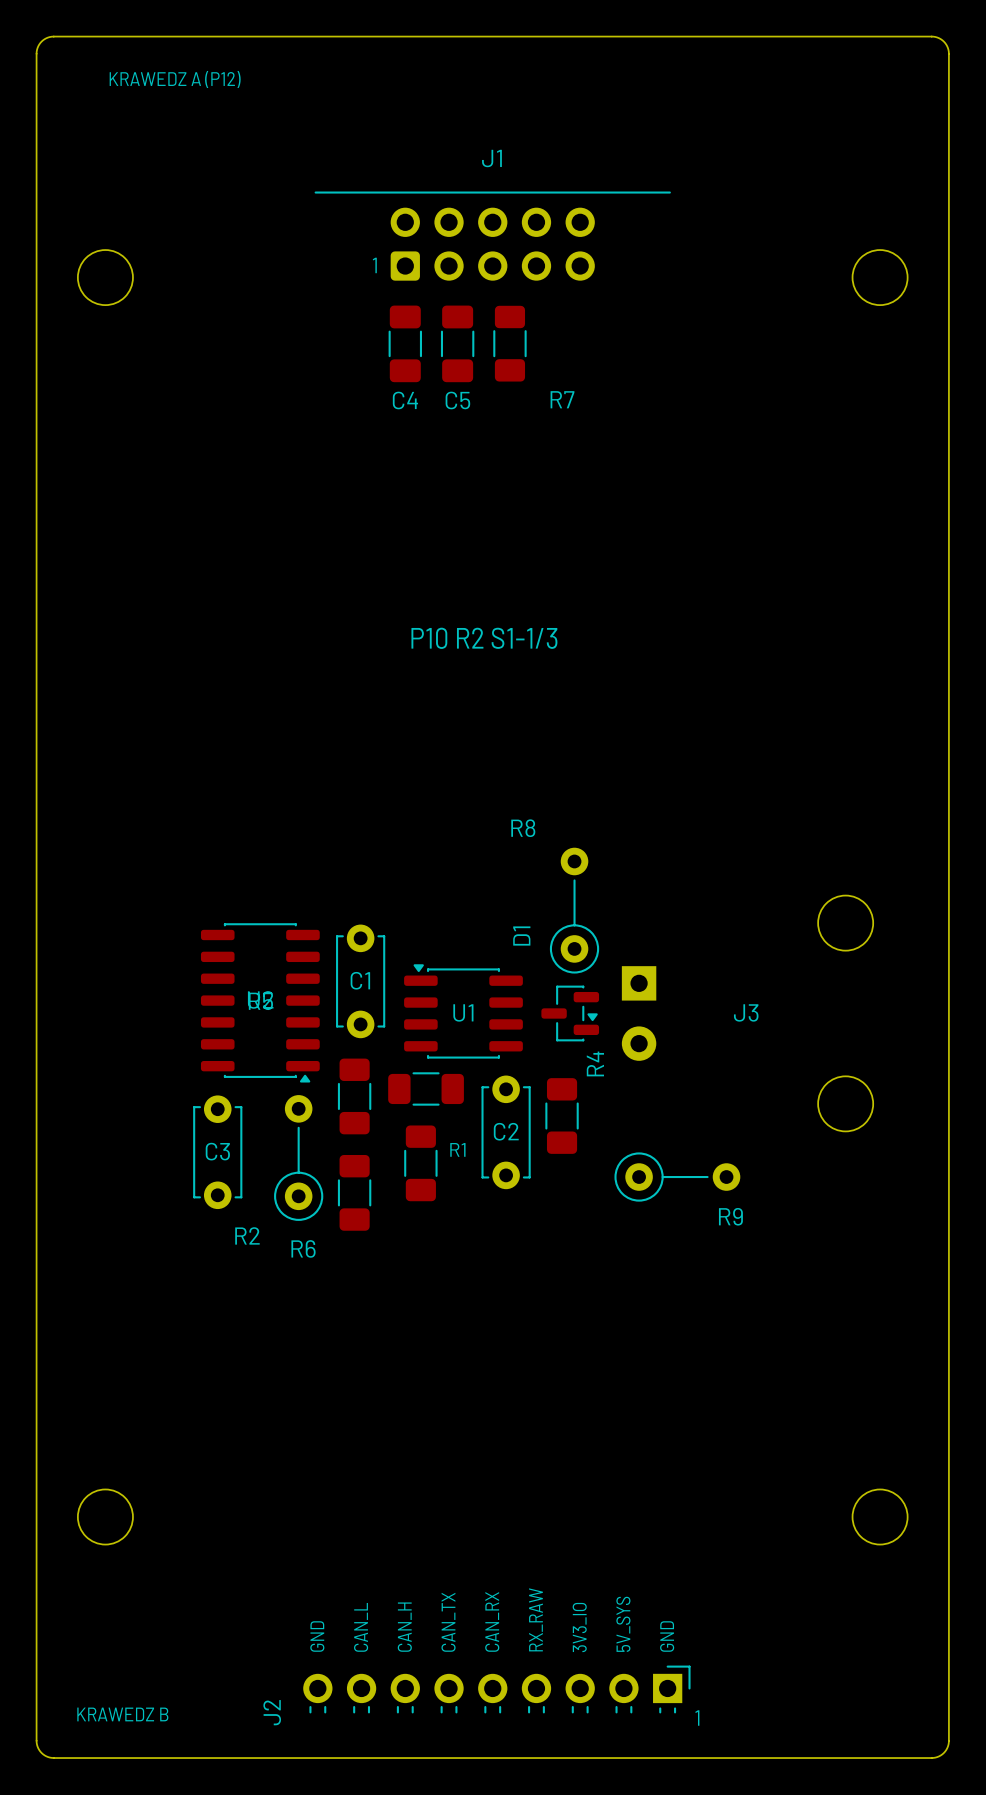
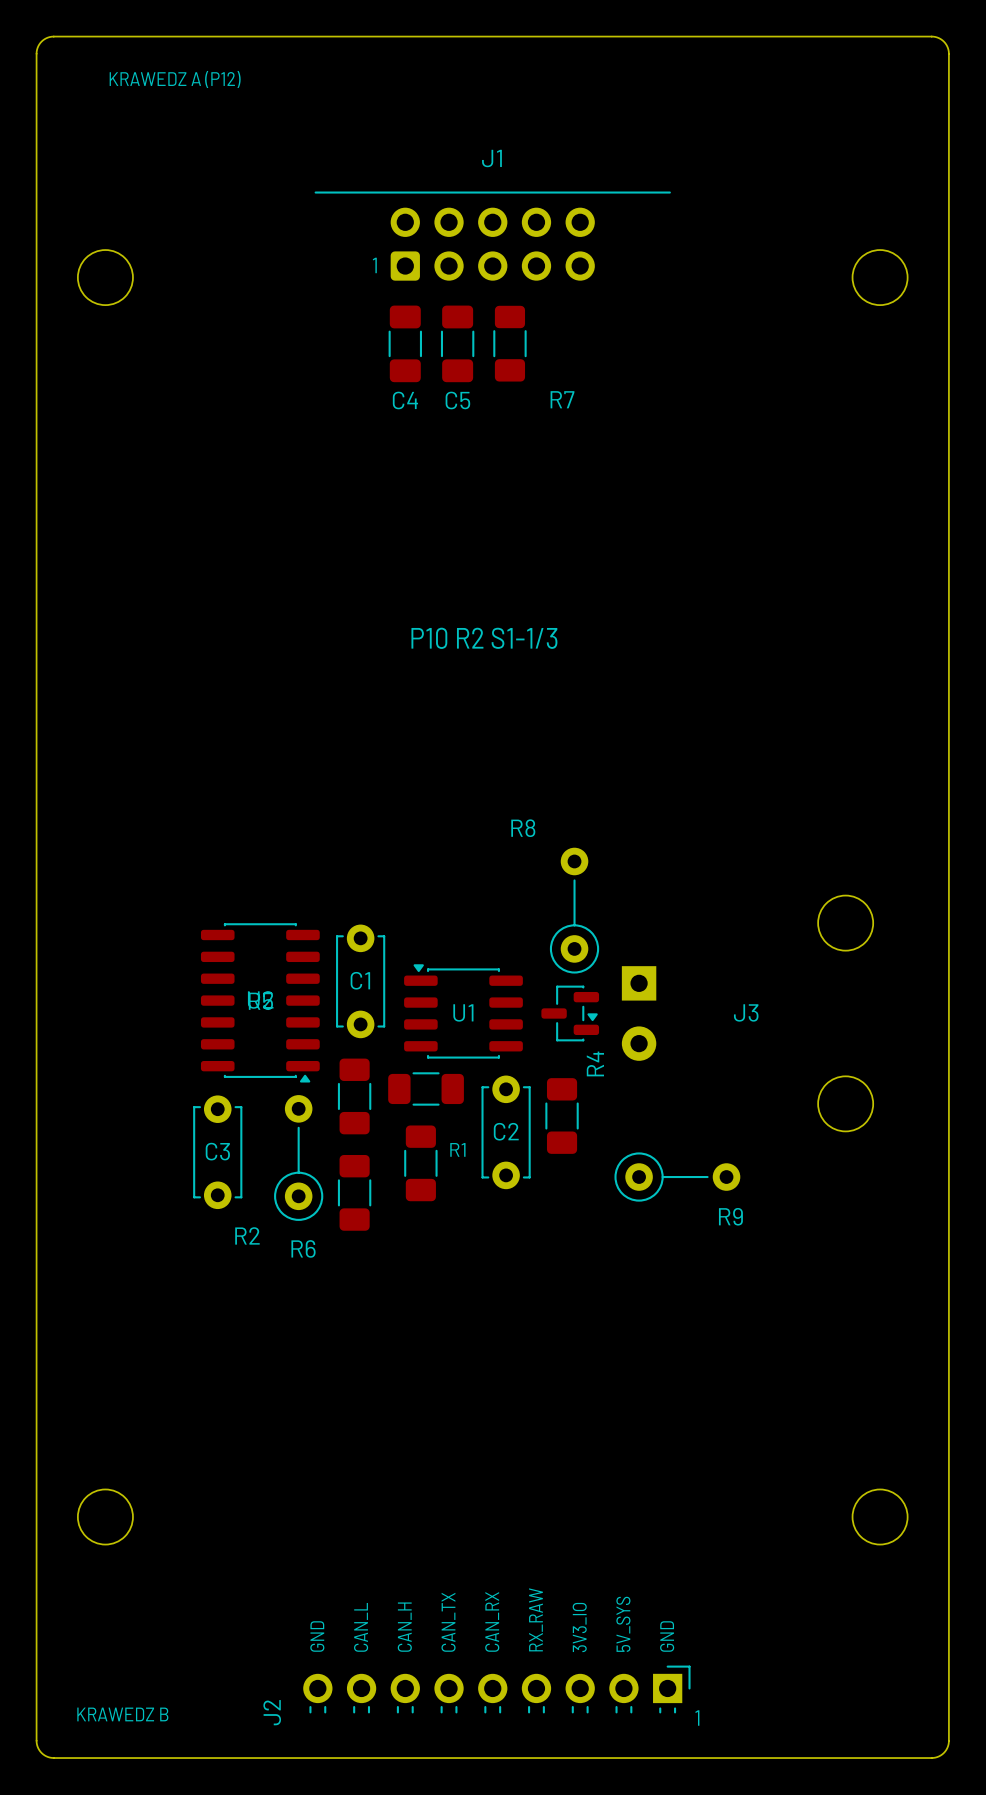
D1 name: D1 (521, 936) -> none

